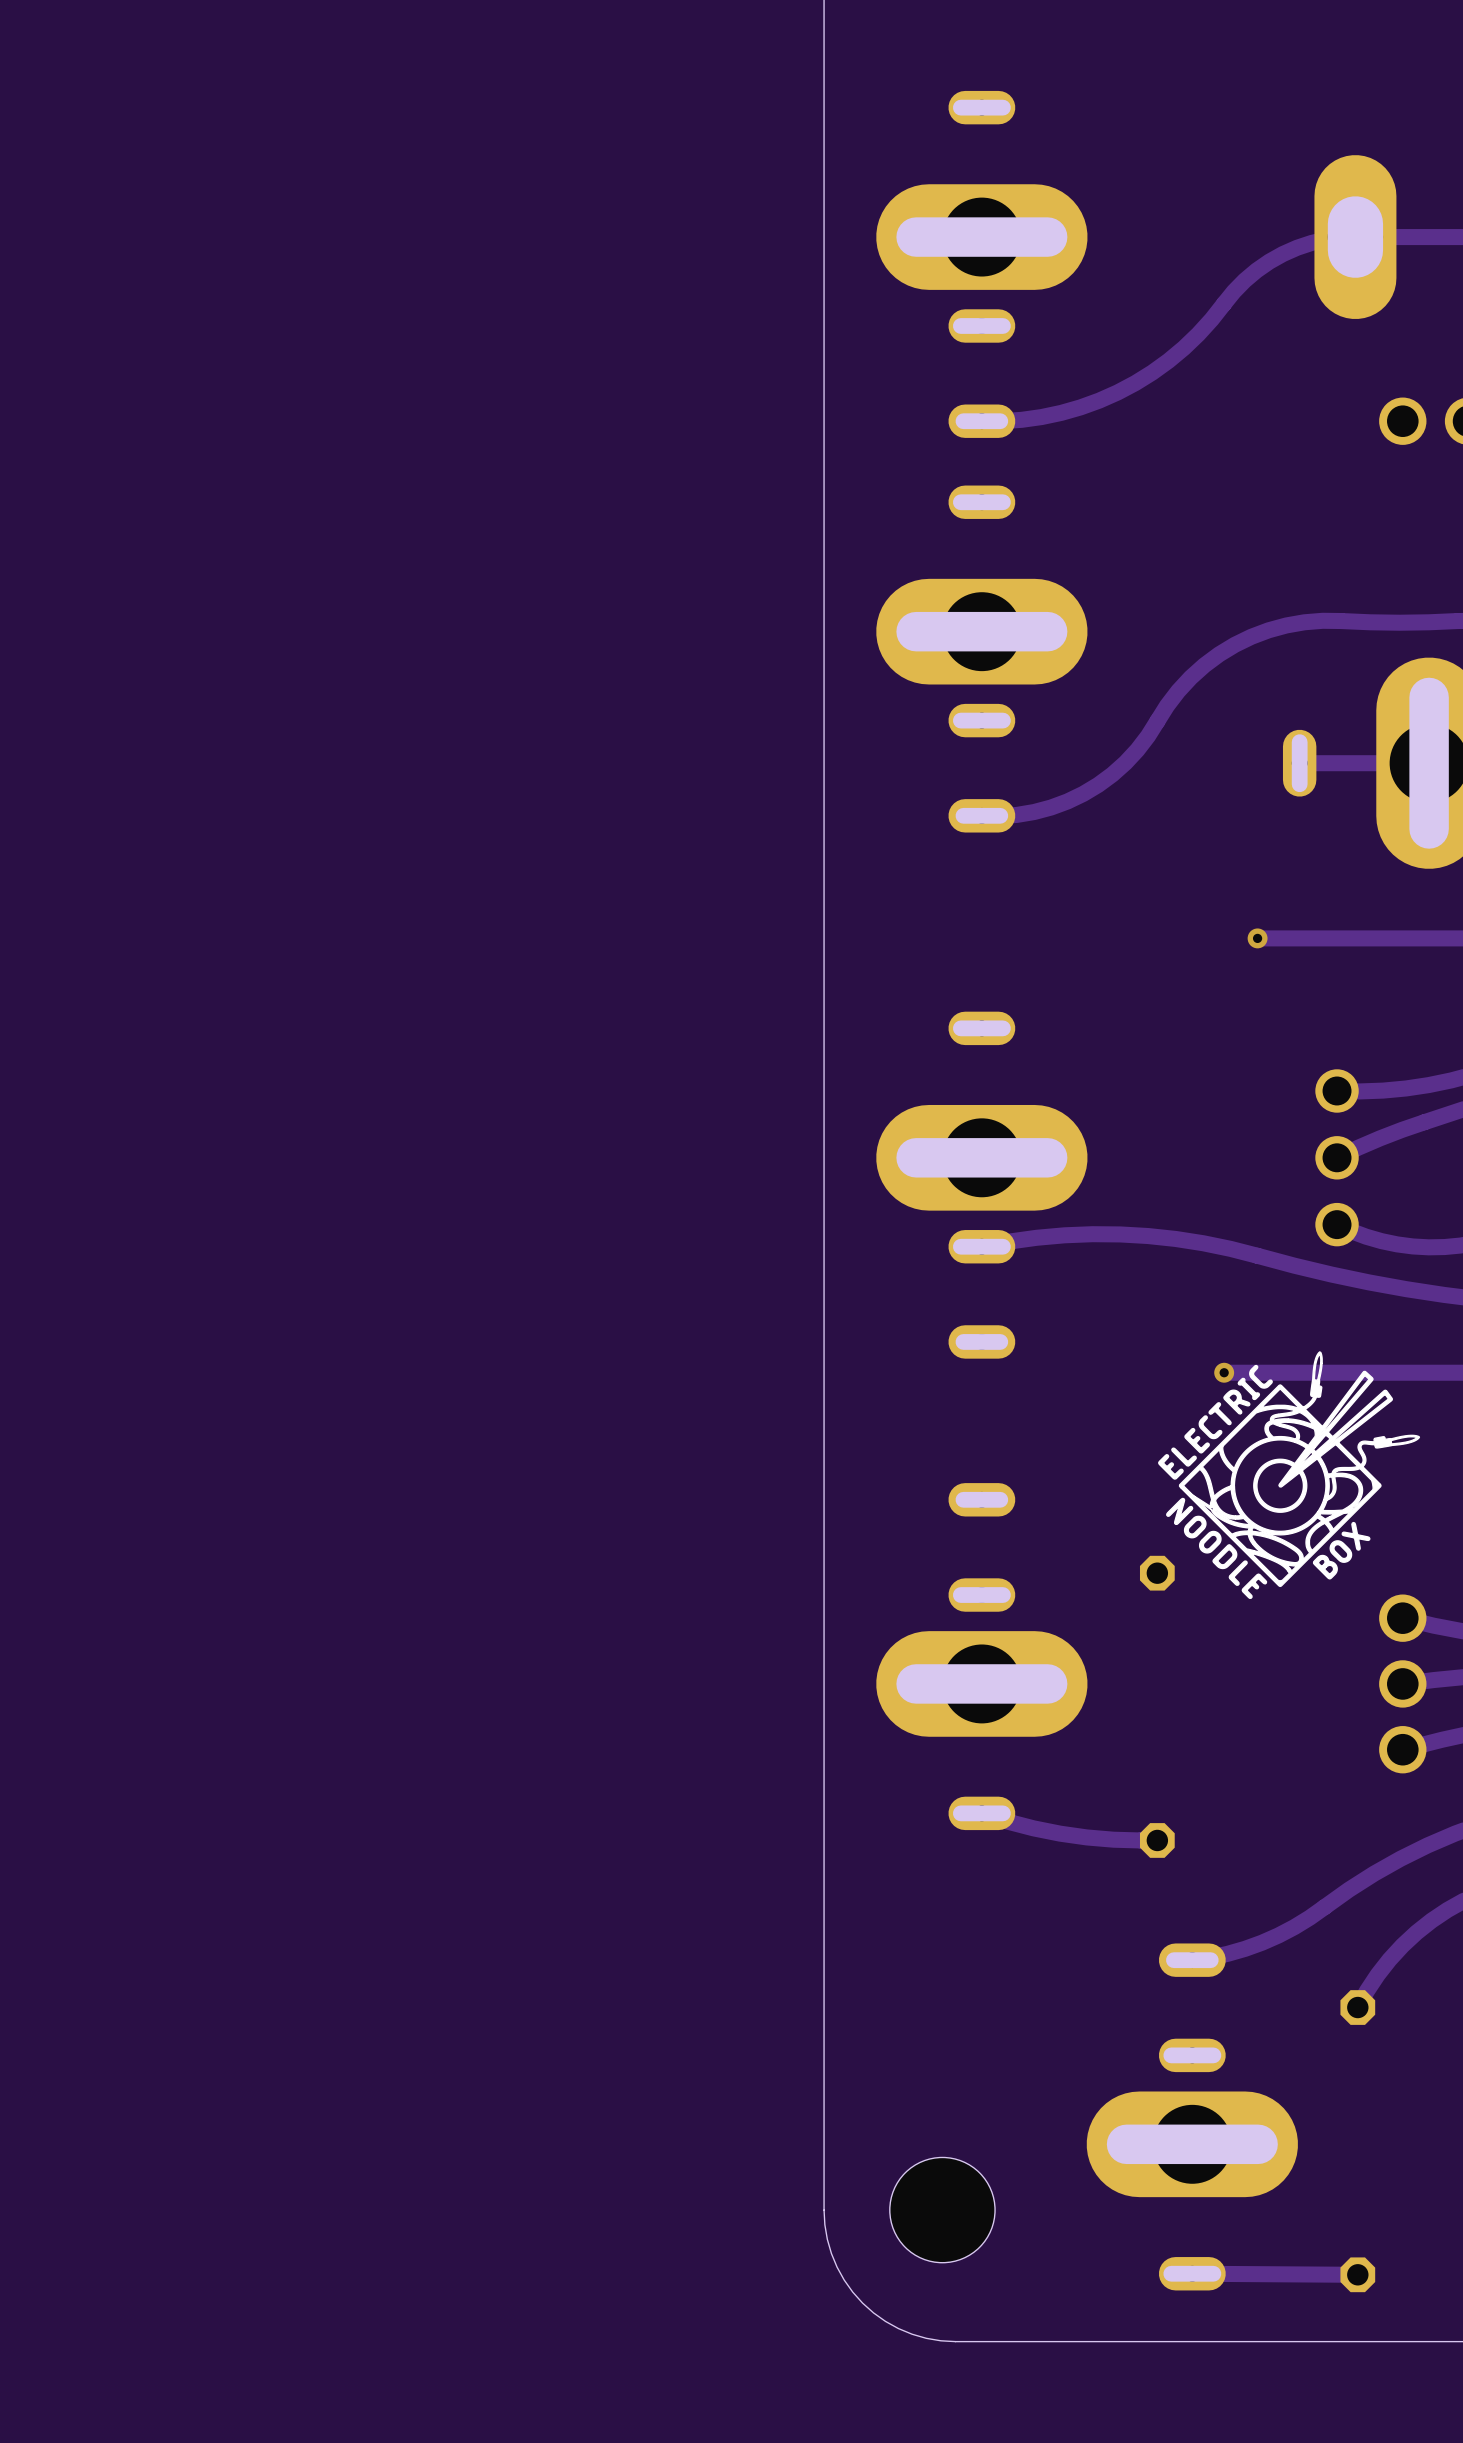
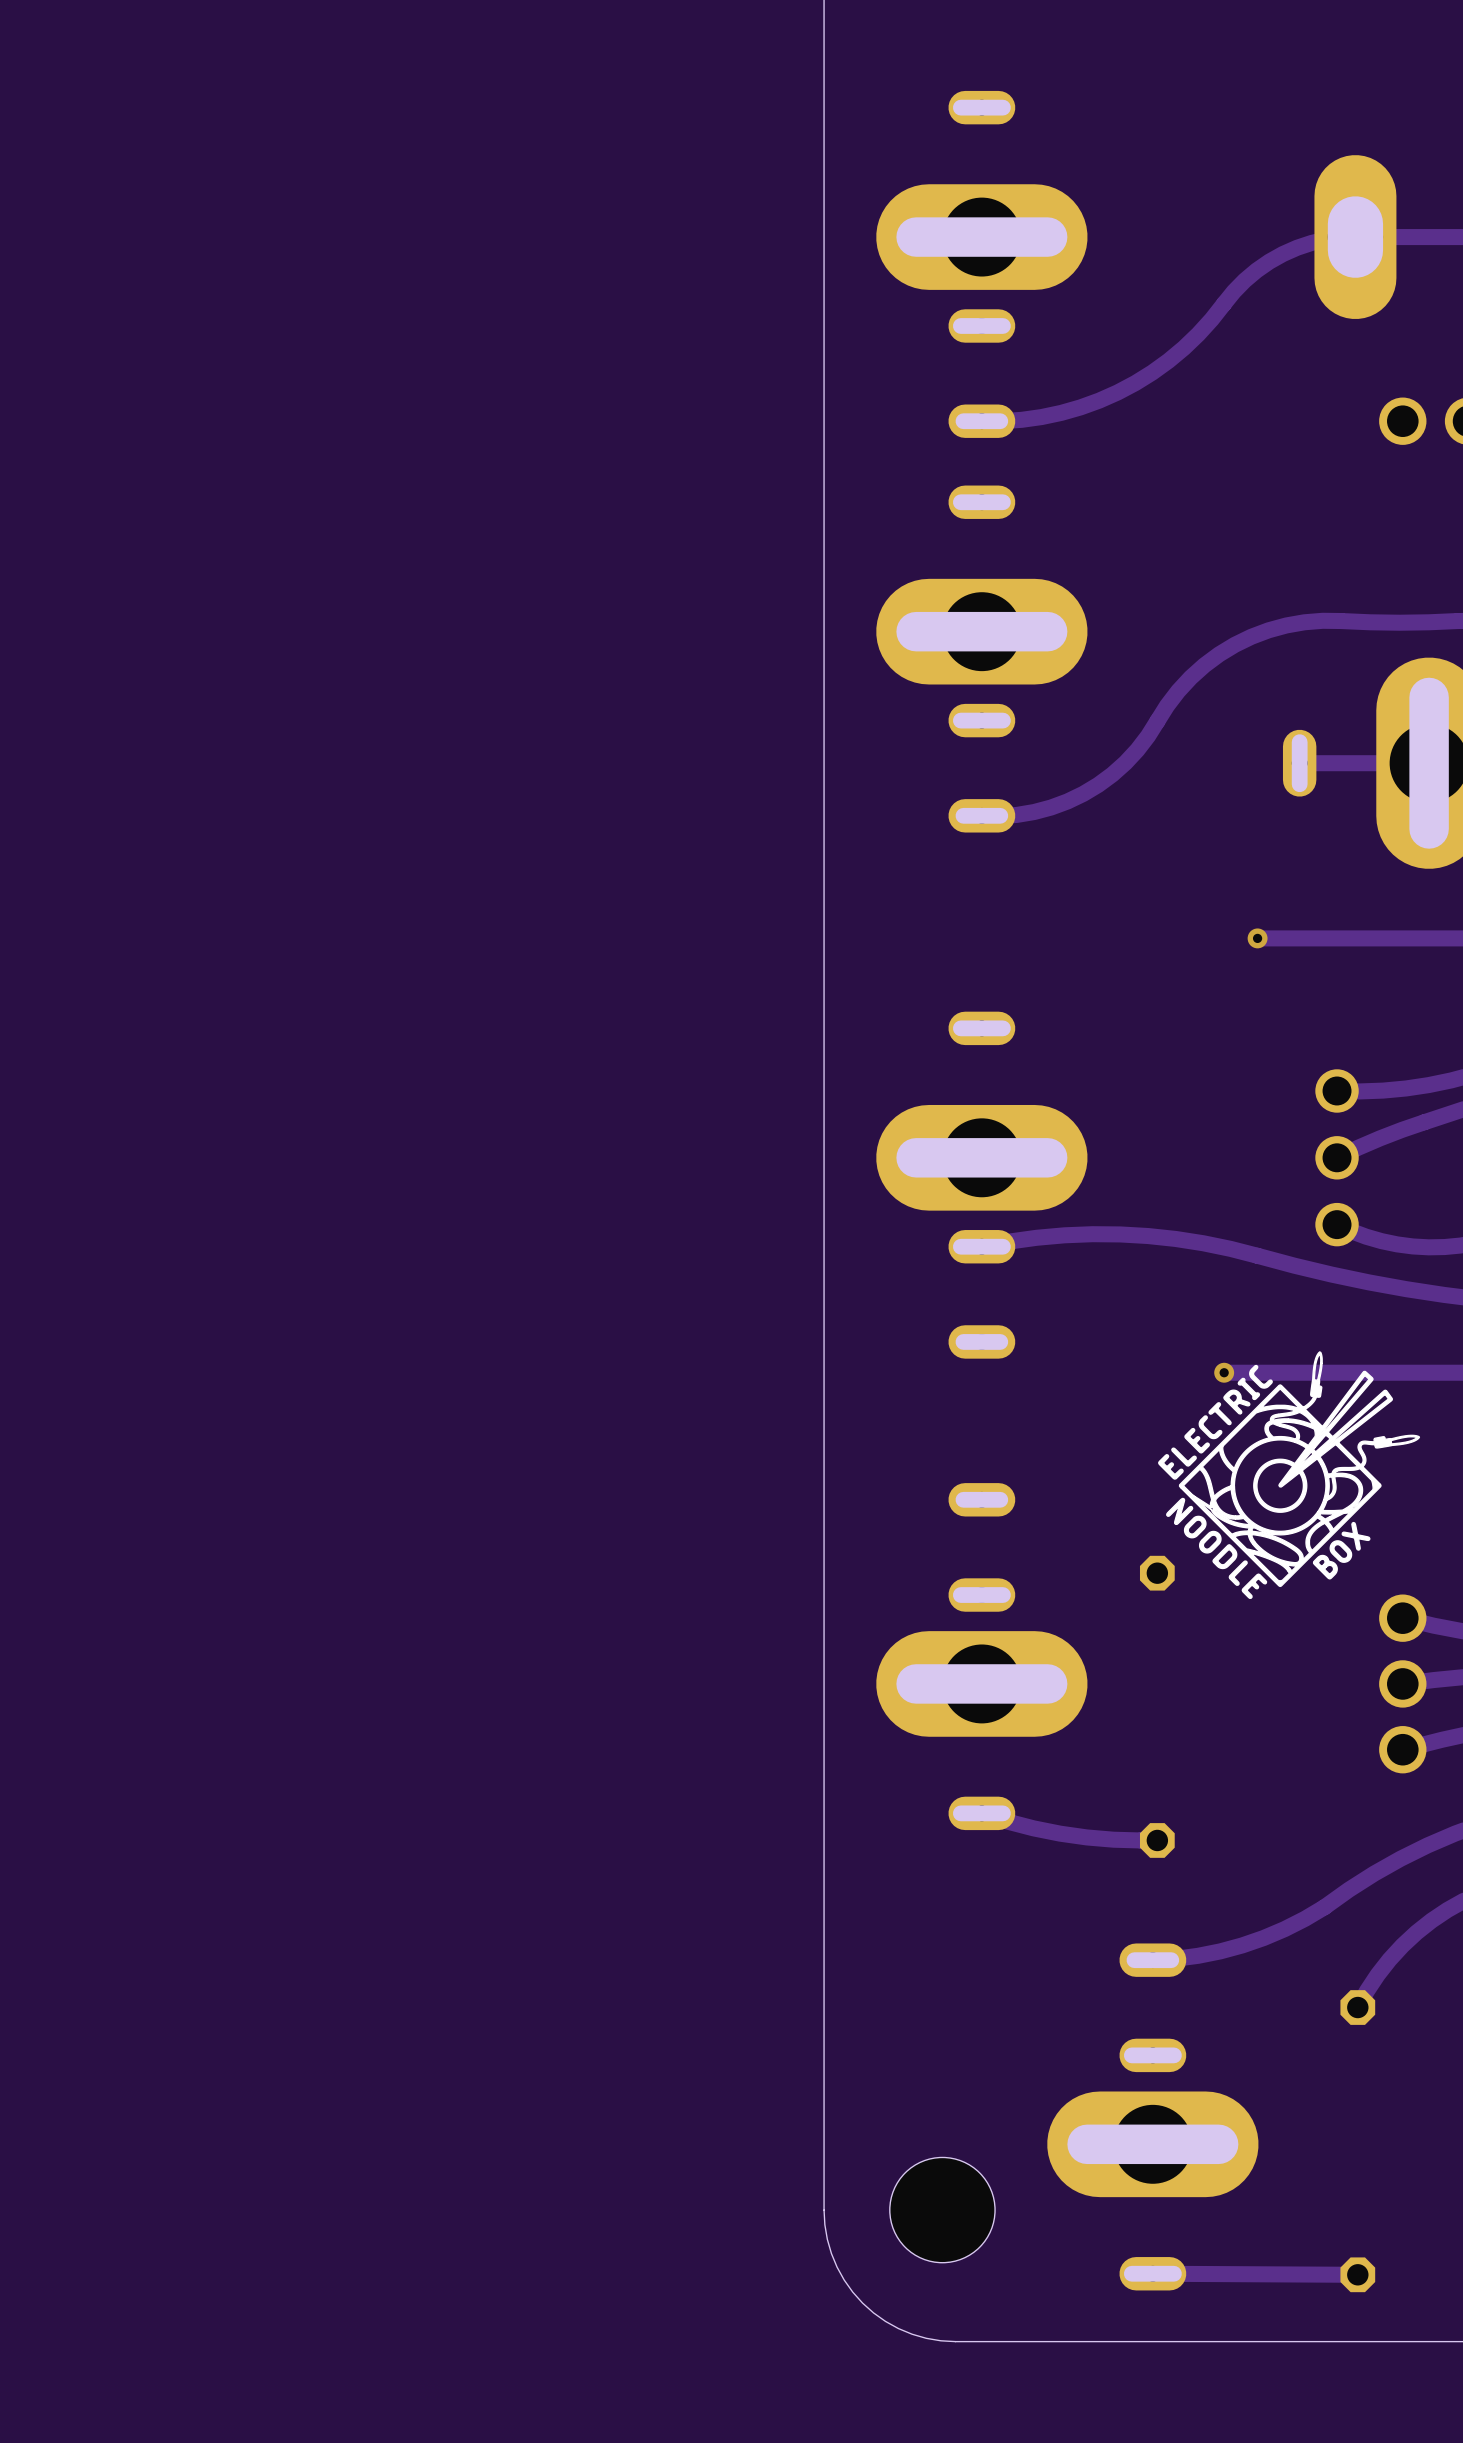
track: (1324, 1907) (1294, 1927) (1261, 1942) (1227, 1953) (1192, 1960) -> (1324, 1907) (1284, 1929) (1242, 1945) (1198, 1955) (1152, 1960)
part position: (1192, 2116) -> (1152, 2116)
track: (1192, 2273) (1357, 2274) -> (1152, 2273) (1357, 2274)

